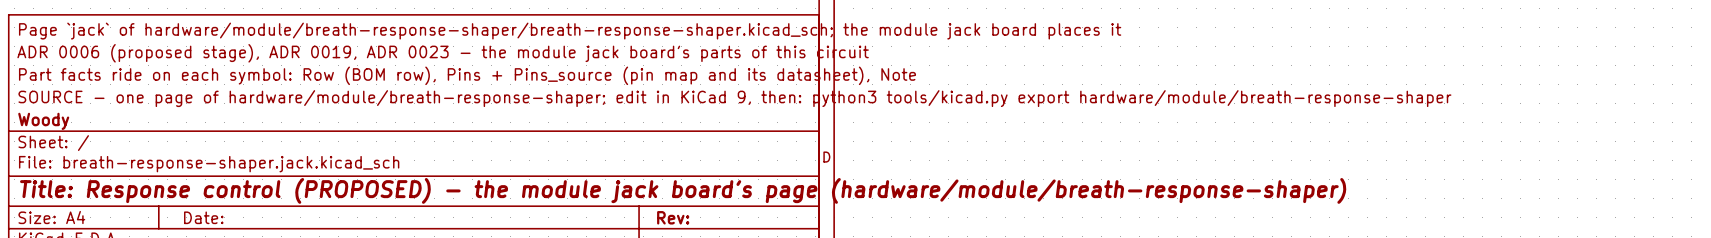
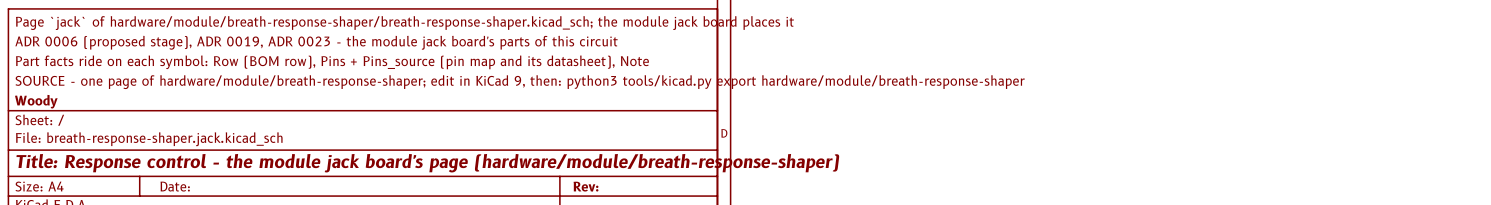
title block: Title: Response control (PROPOSED) - the module jack board's page (hardware/module/breath-response-shaper) (683, 190) -> Title: Response control - the module jack board's page (hardware/module/breath-response-shaper) (427, 163)

